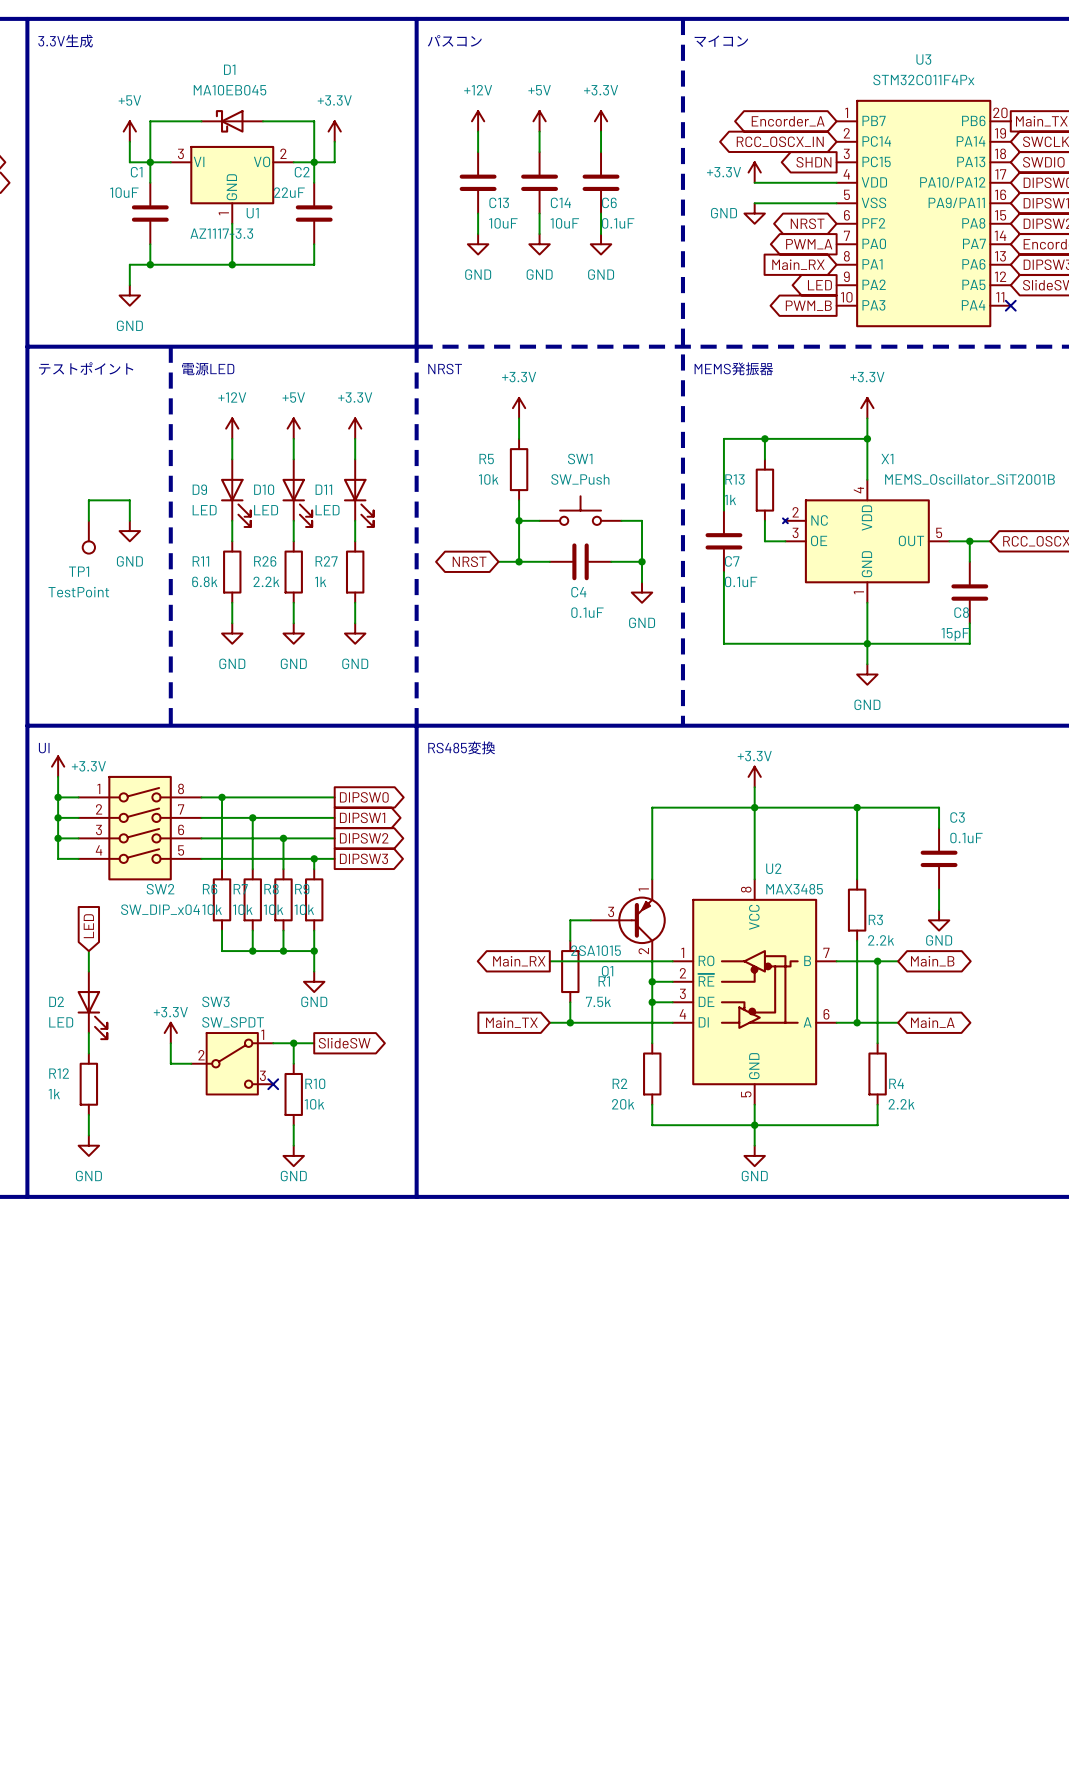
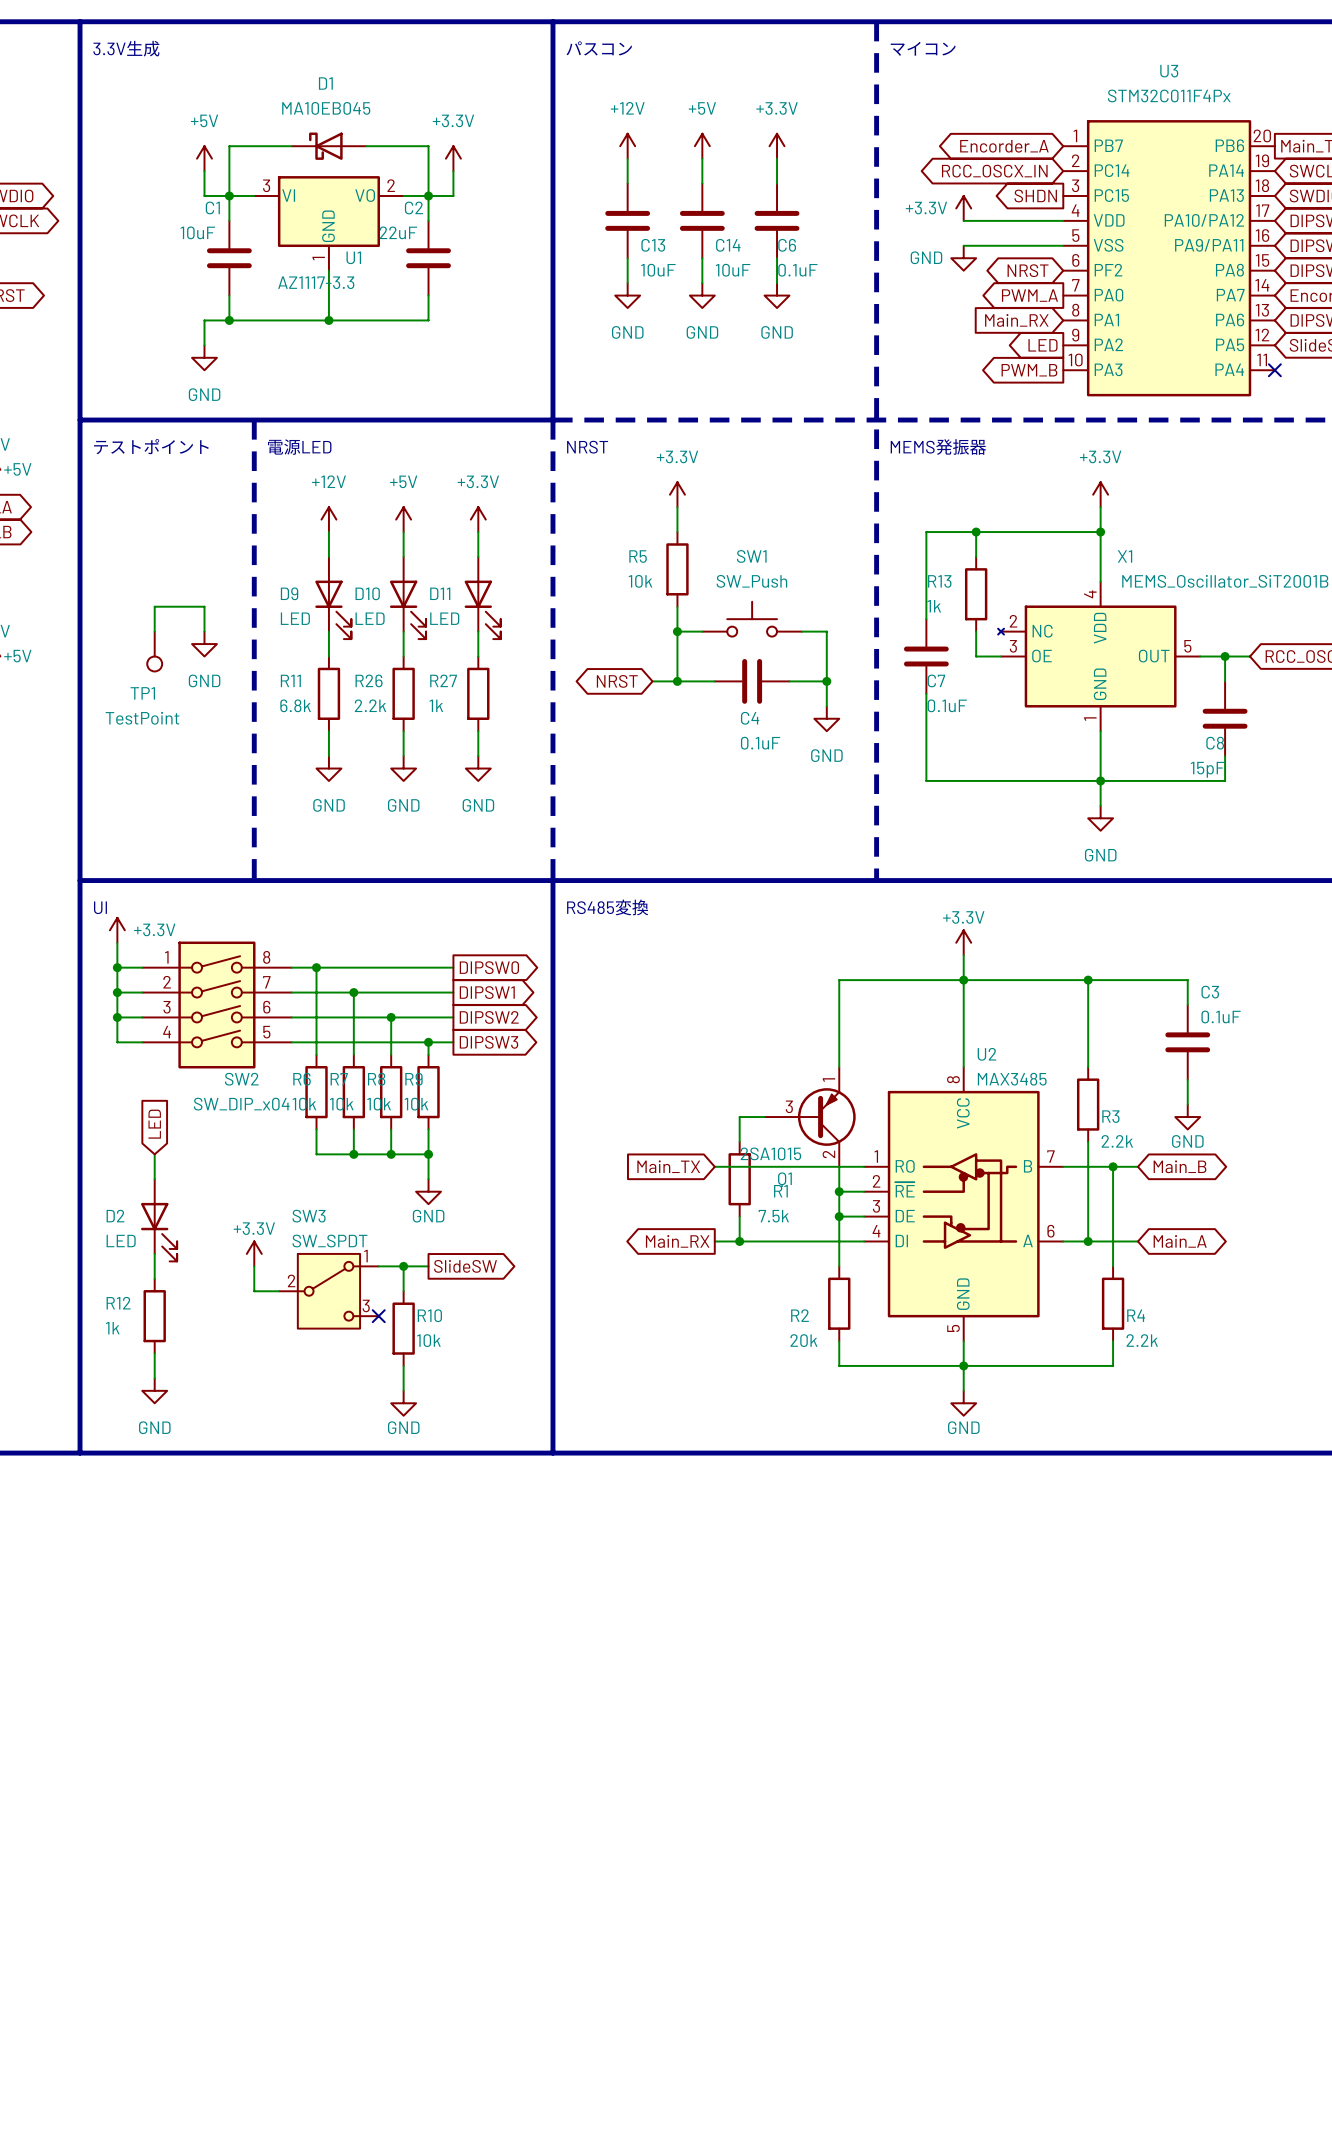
global label shape: output (519, 961) -> input (668, 1166)
global label: Main_RX (519, 961) -> Main_TX (668, 1166)
global label shape: input (511, 1022) -> output (677, 1241)
global label: Main_TX (511, 1022) -> Main_RX (677, 1241)

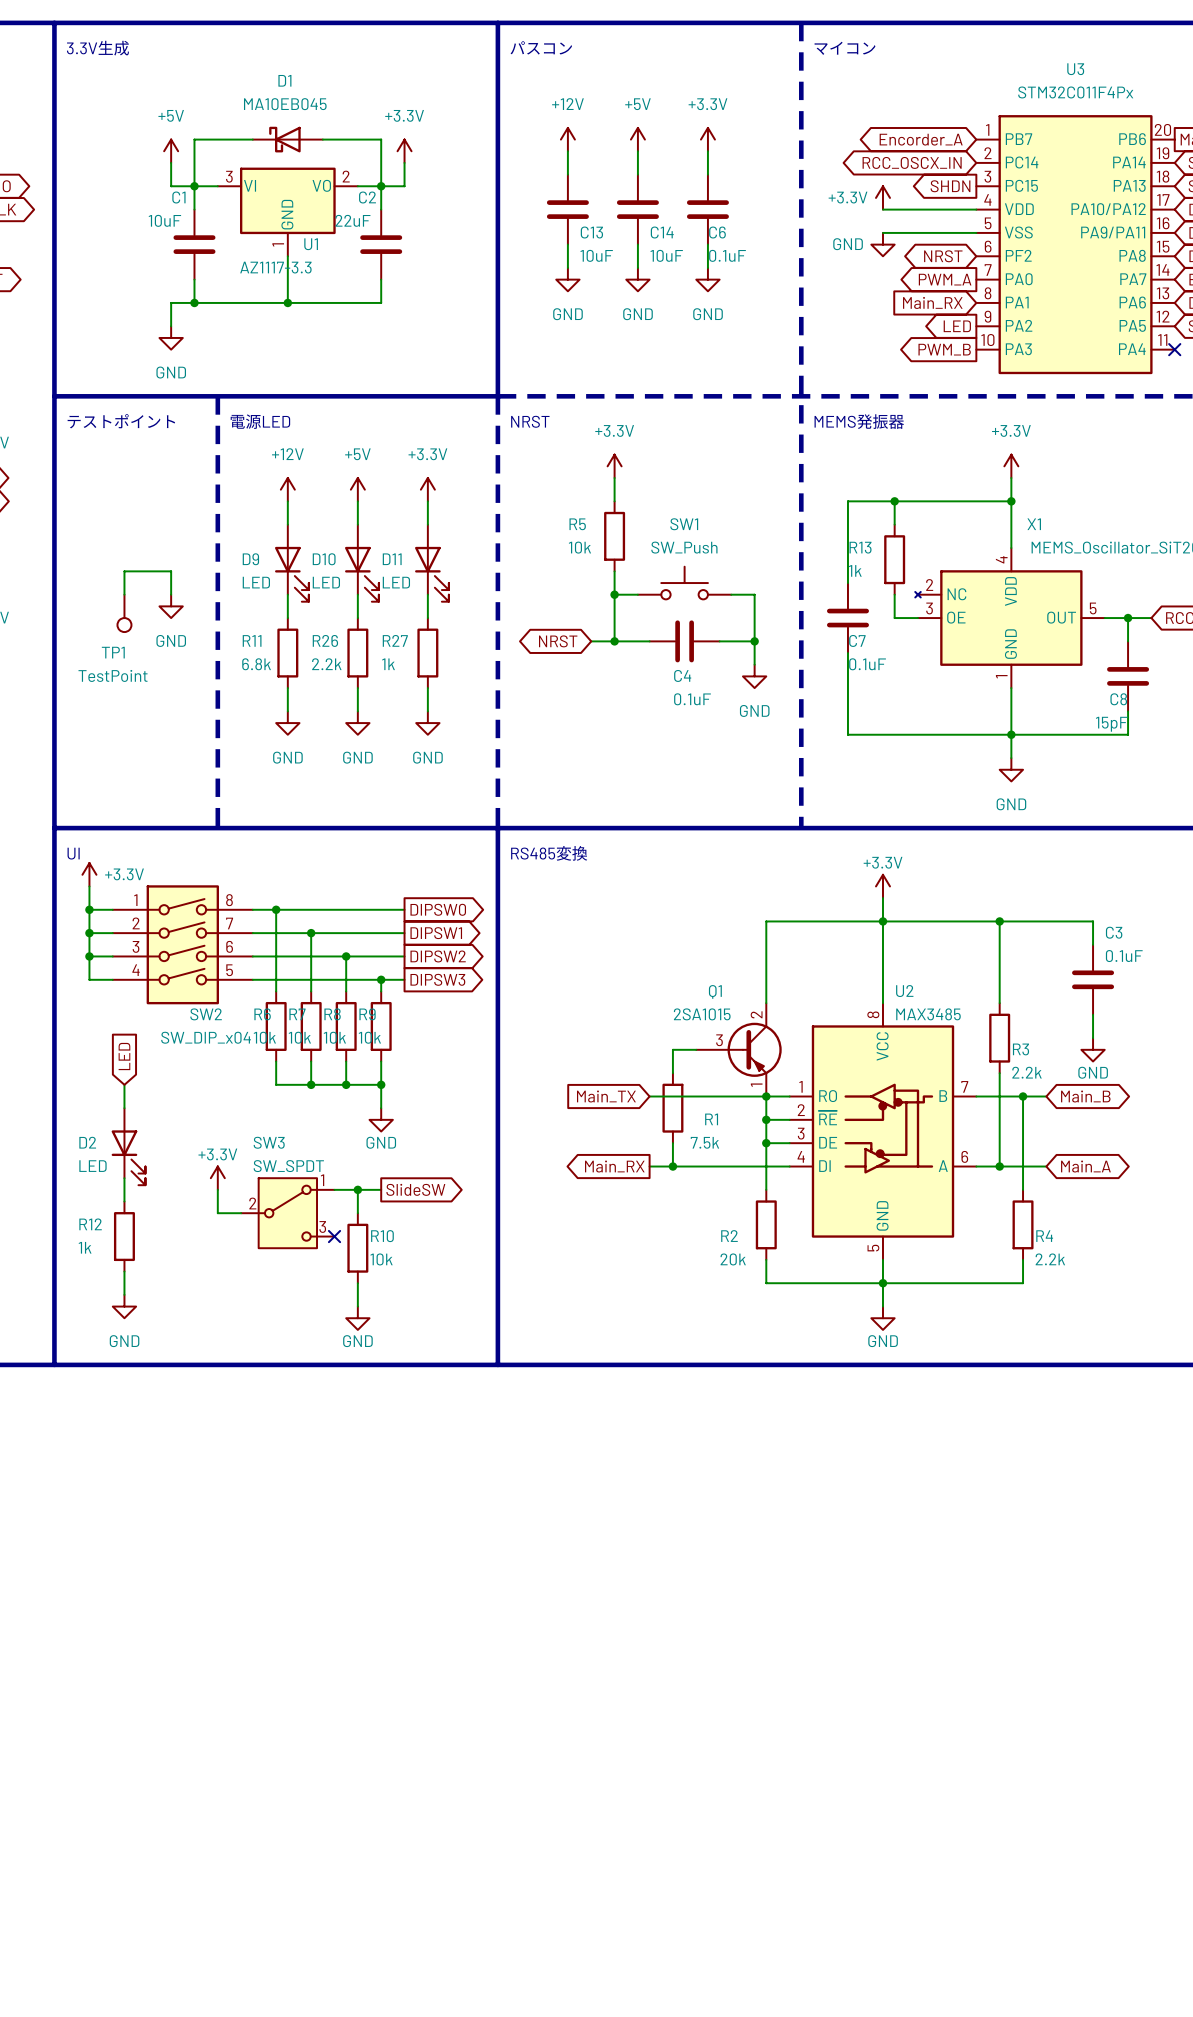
Q1 flip: as is (826, 1117) -> up-down (754, 1049)
junction: none -> (766, 1096)

